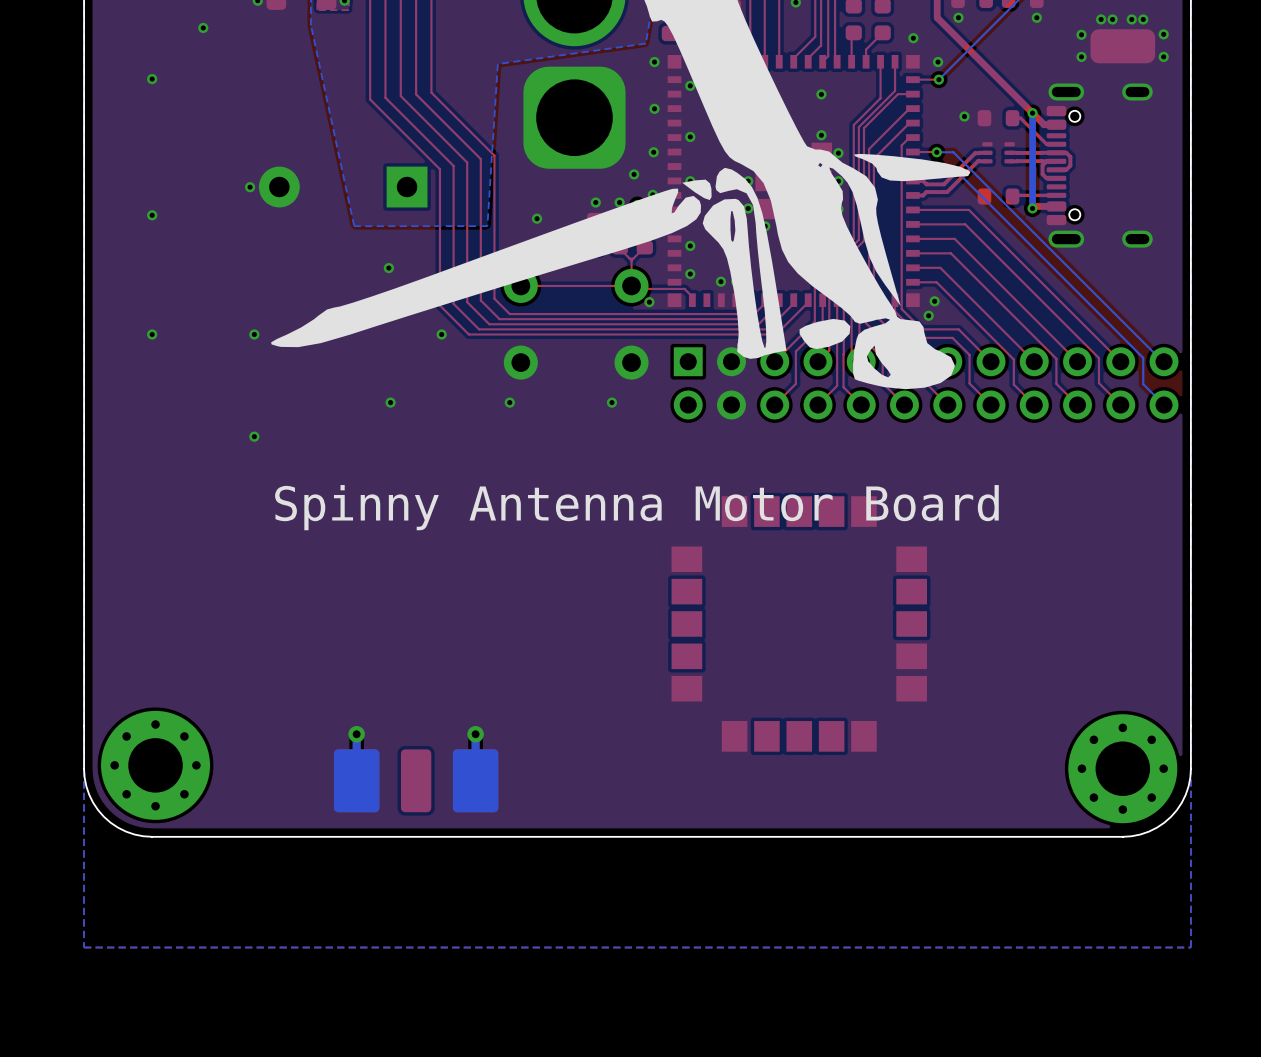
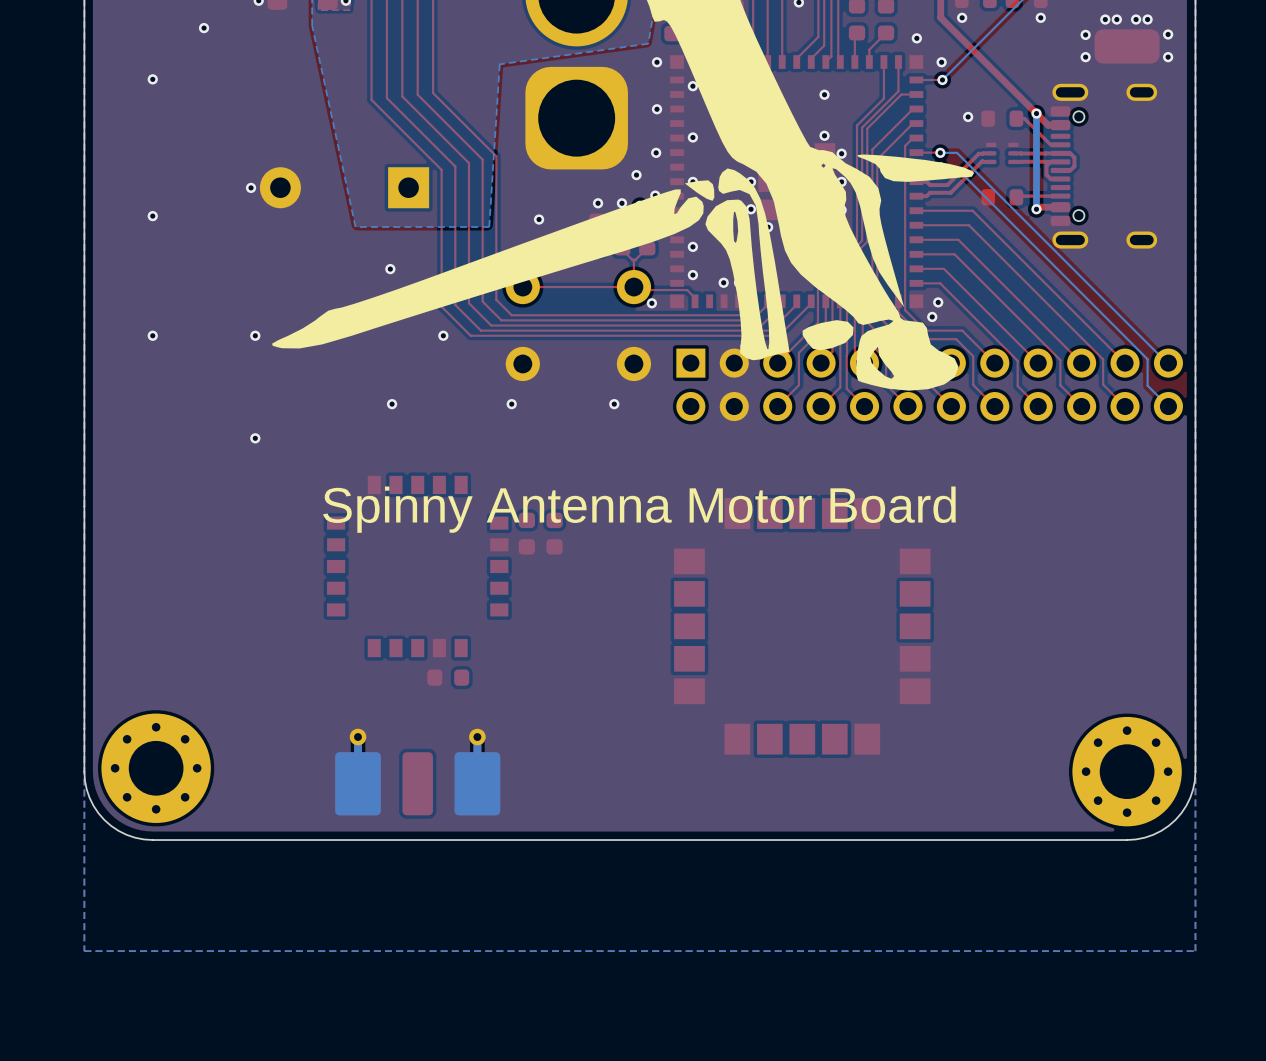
part: none -> (526, 533)
part: none -> (554, 533)
part: none -> (417, 566)
part: none -> (448, 677)

